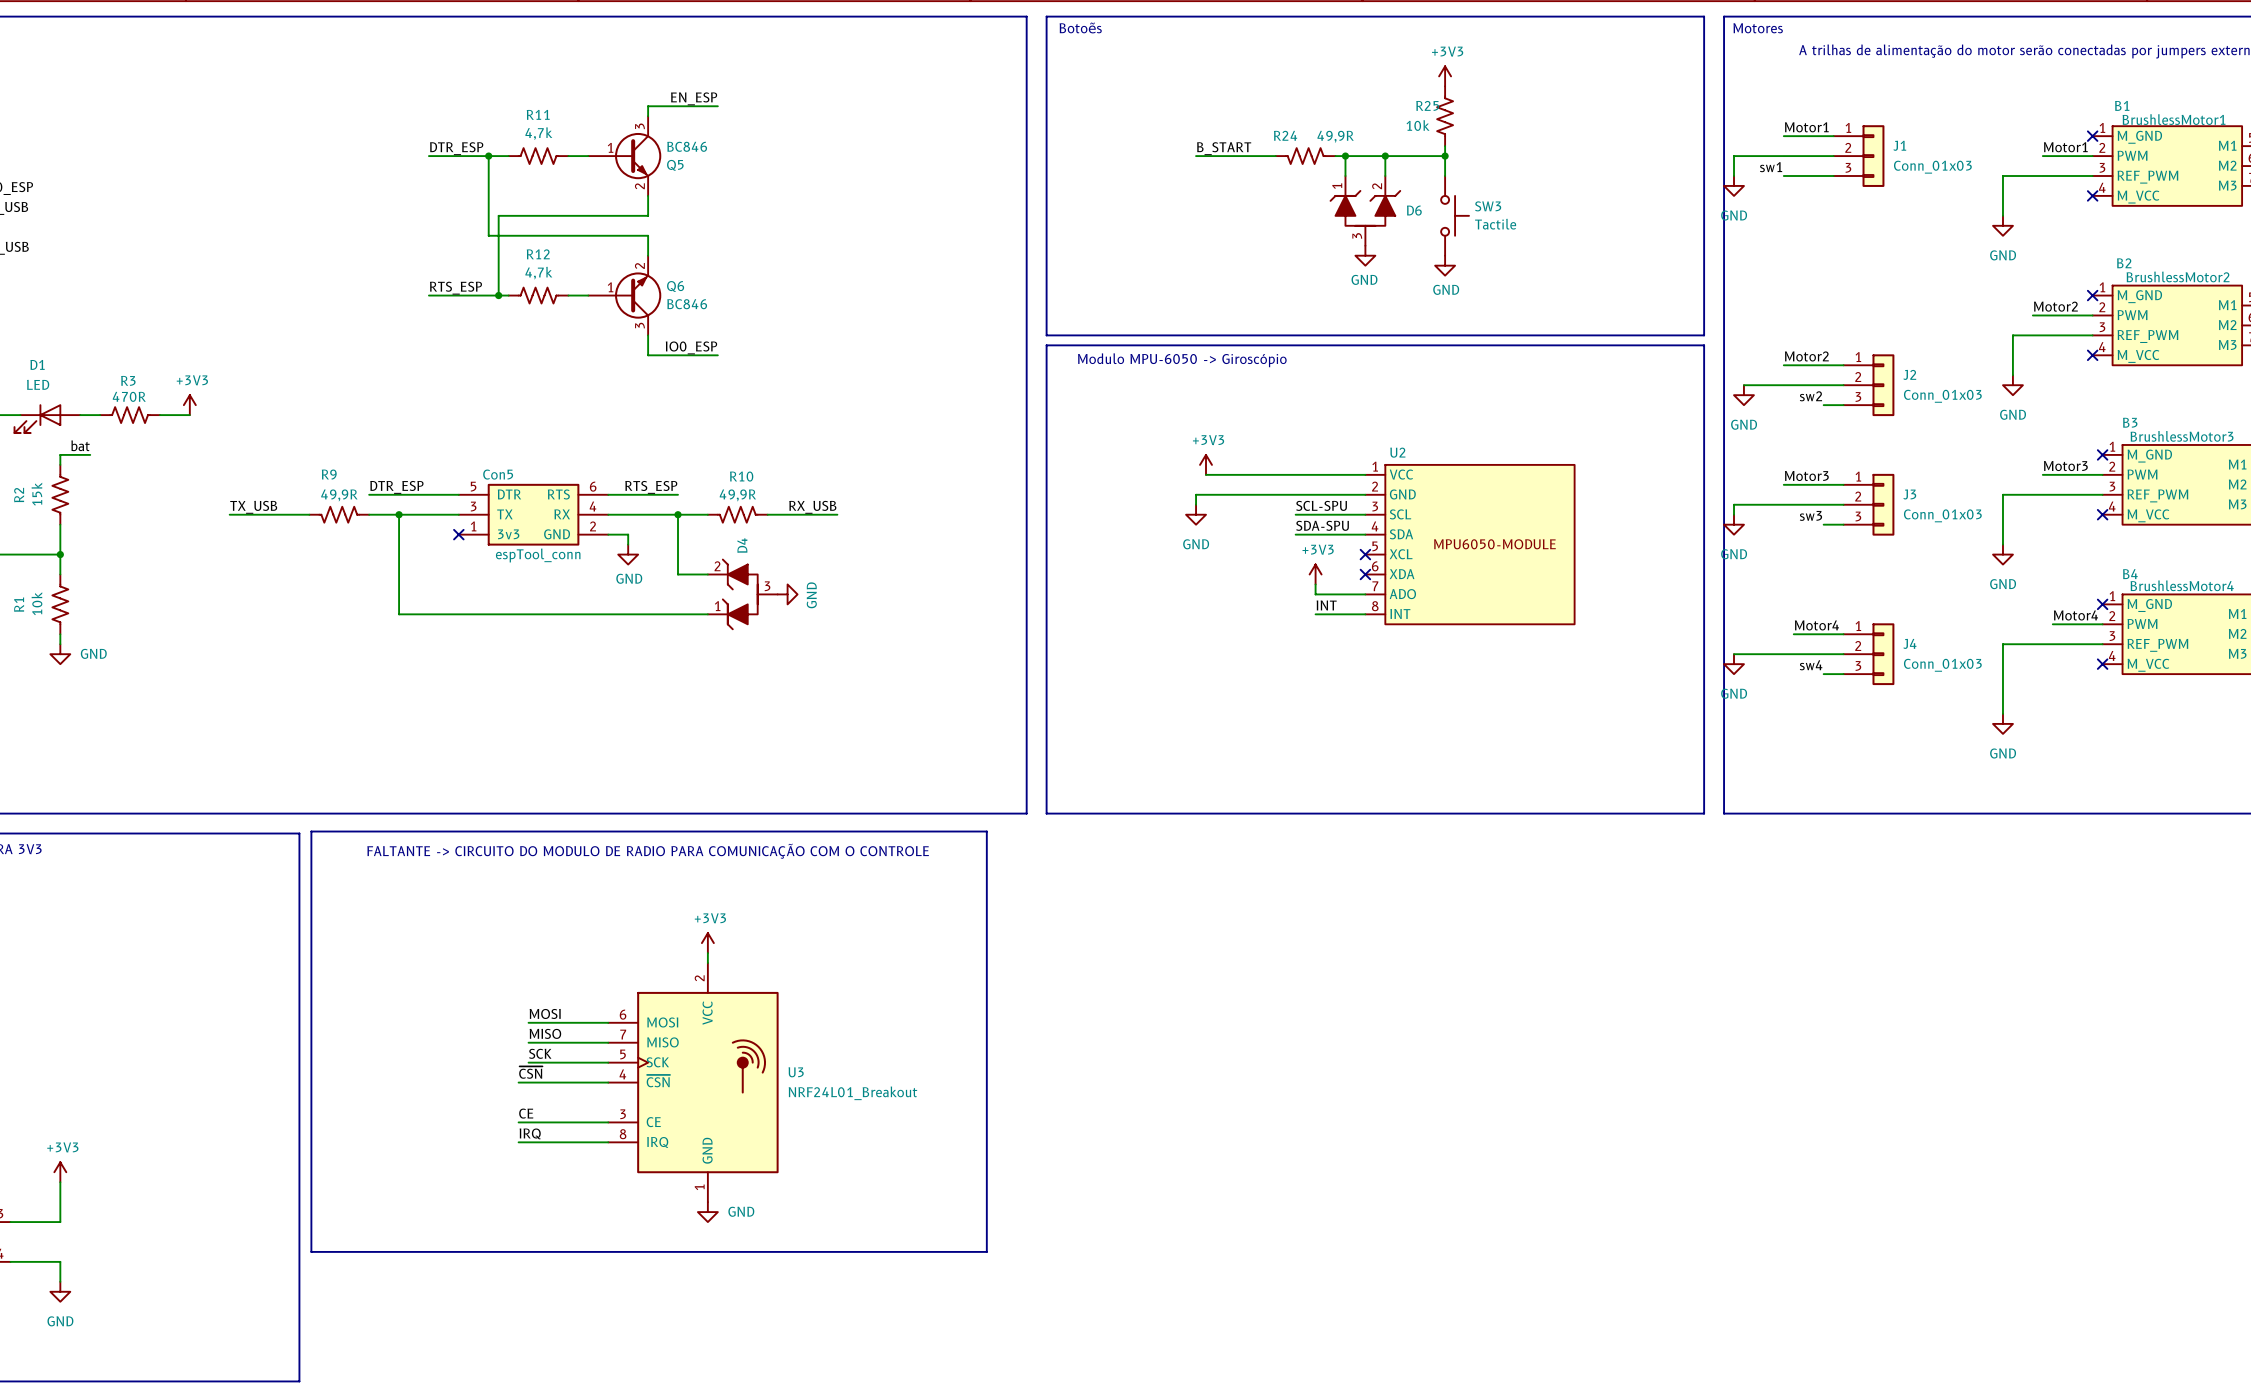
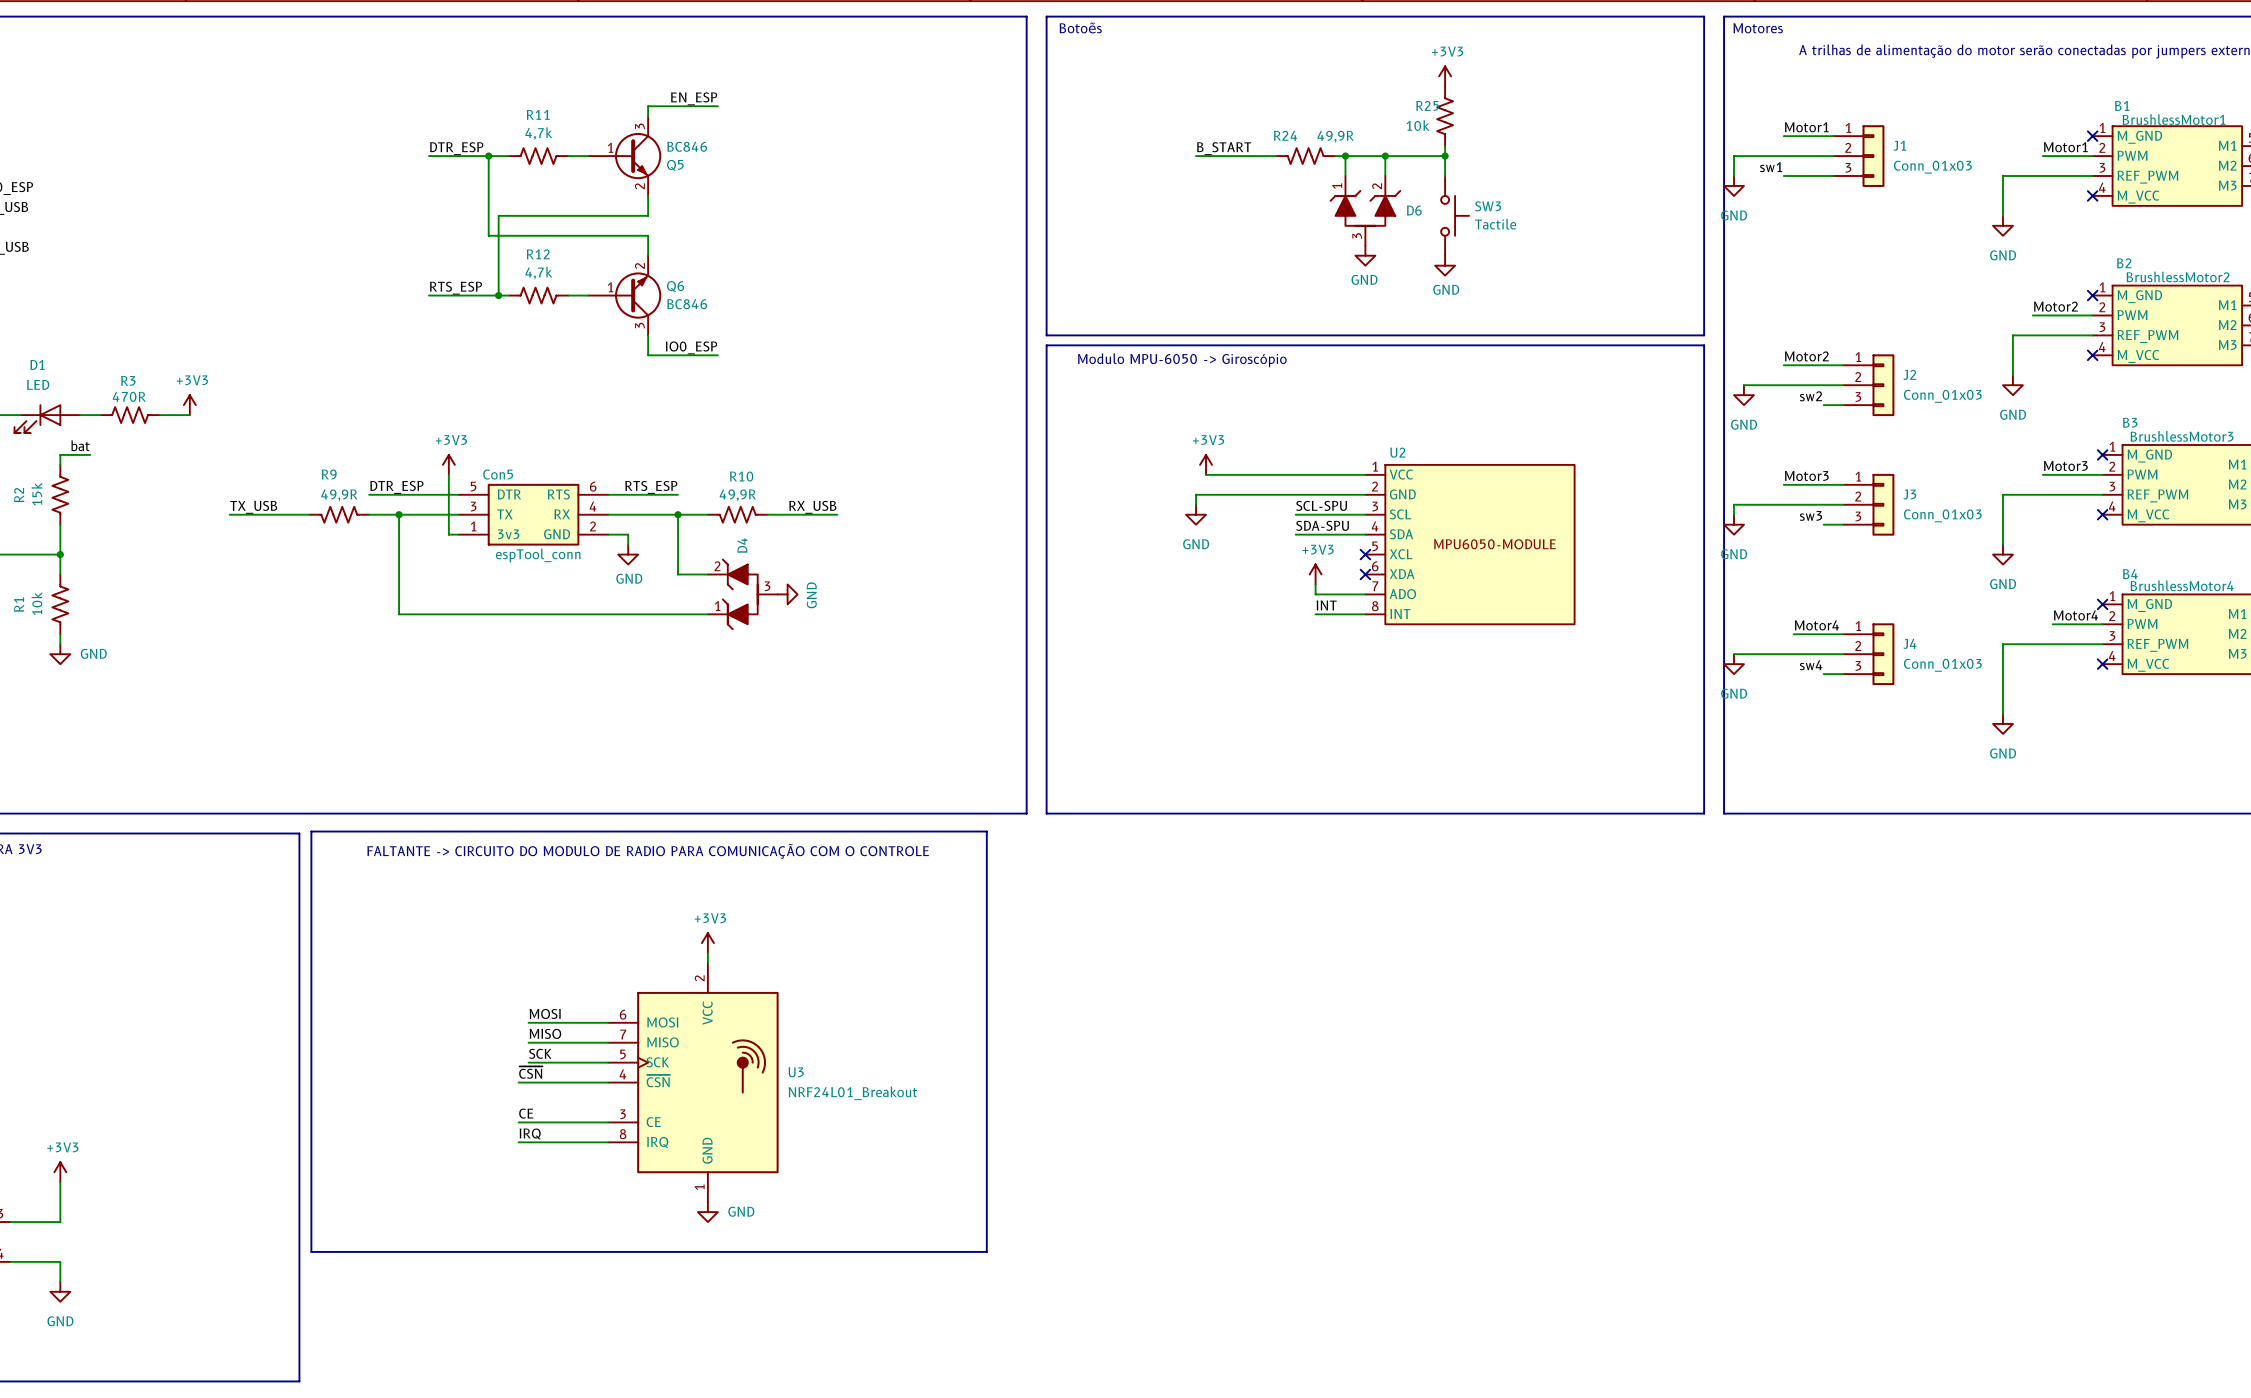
power symbol: none -> +3V3 (448, 464)
wire: none -> (448, 474) (448, 534) (458, 534)
no-connect mark: (458, 534) -> none

